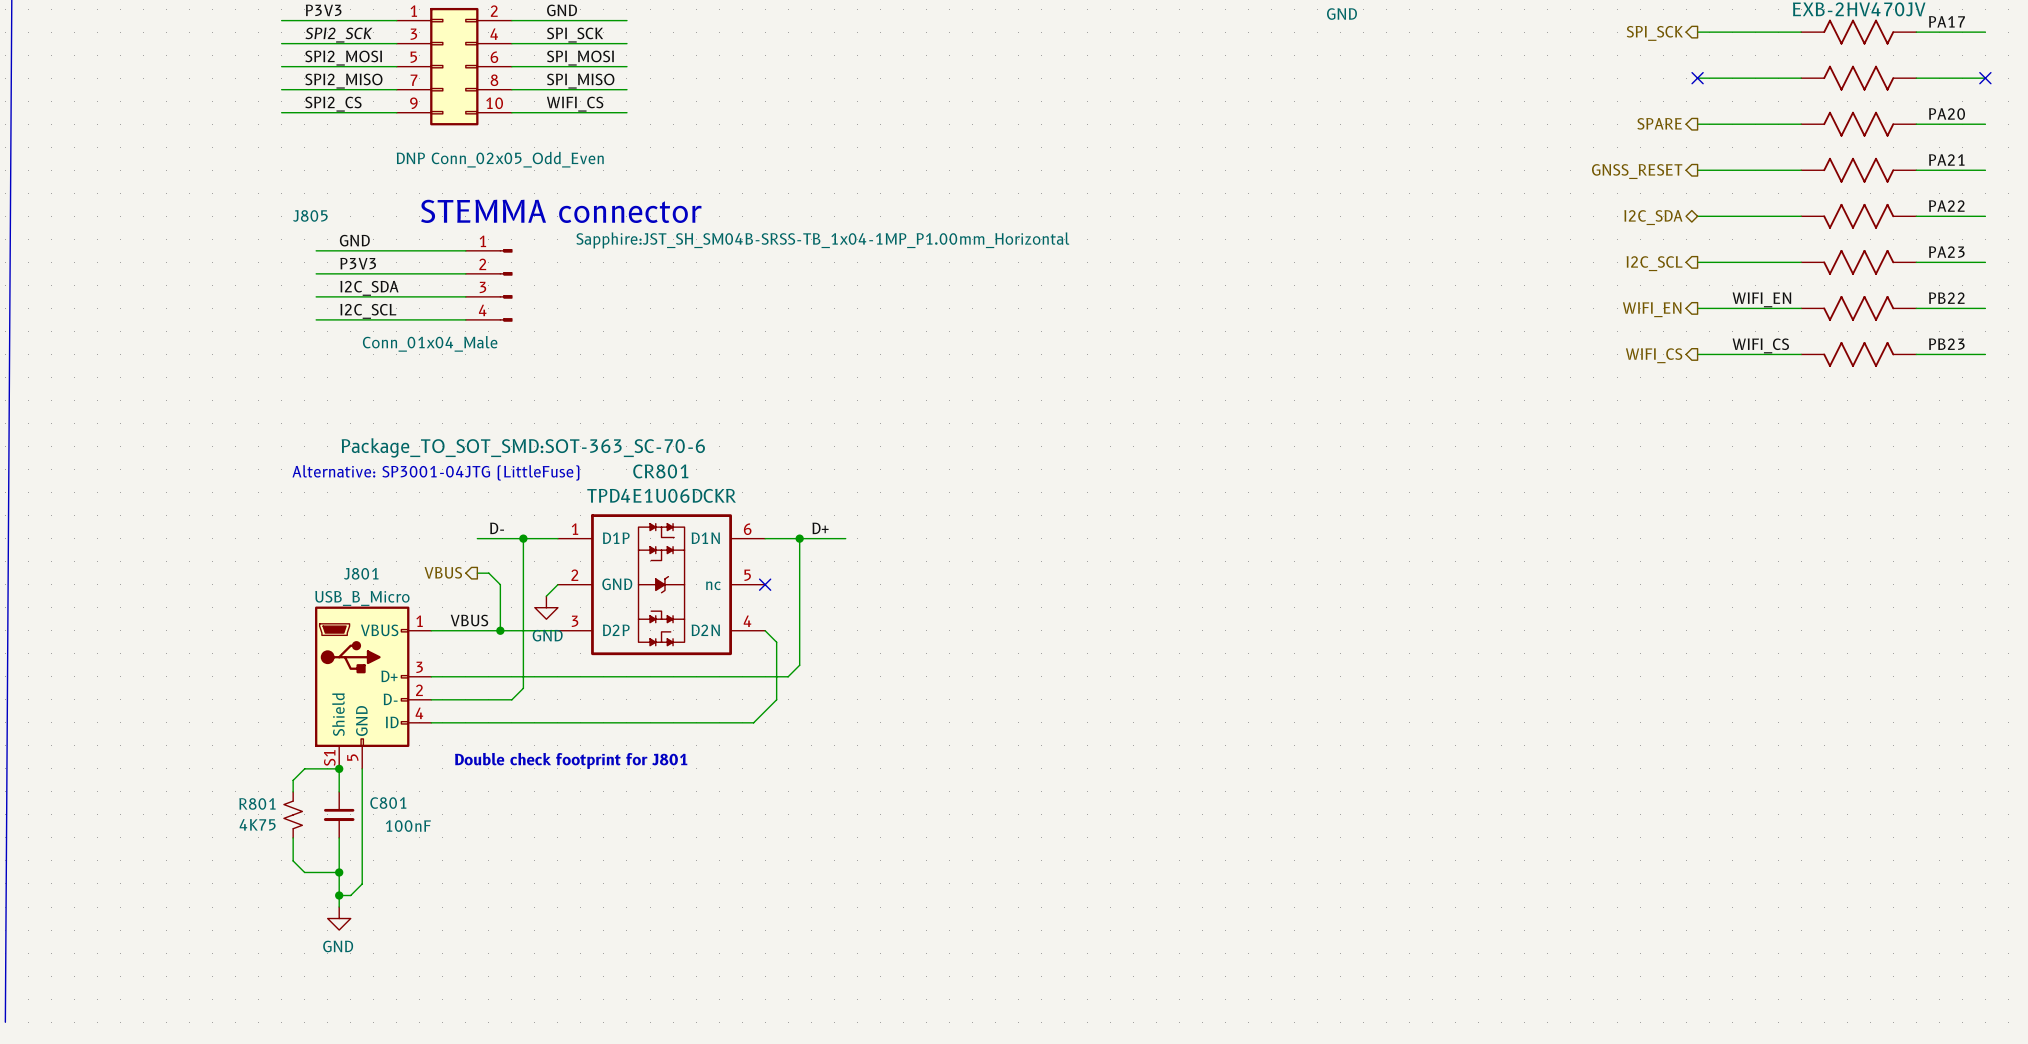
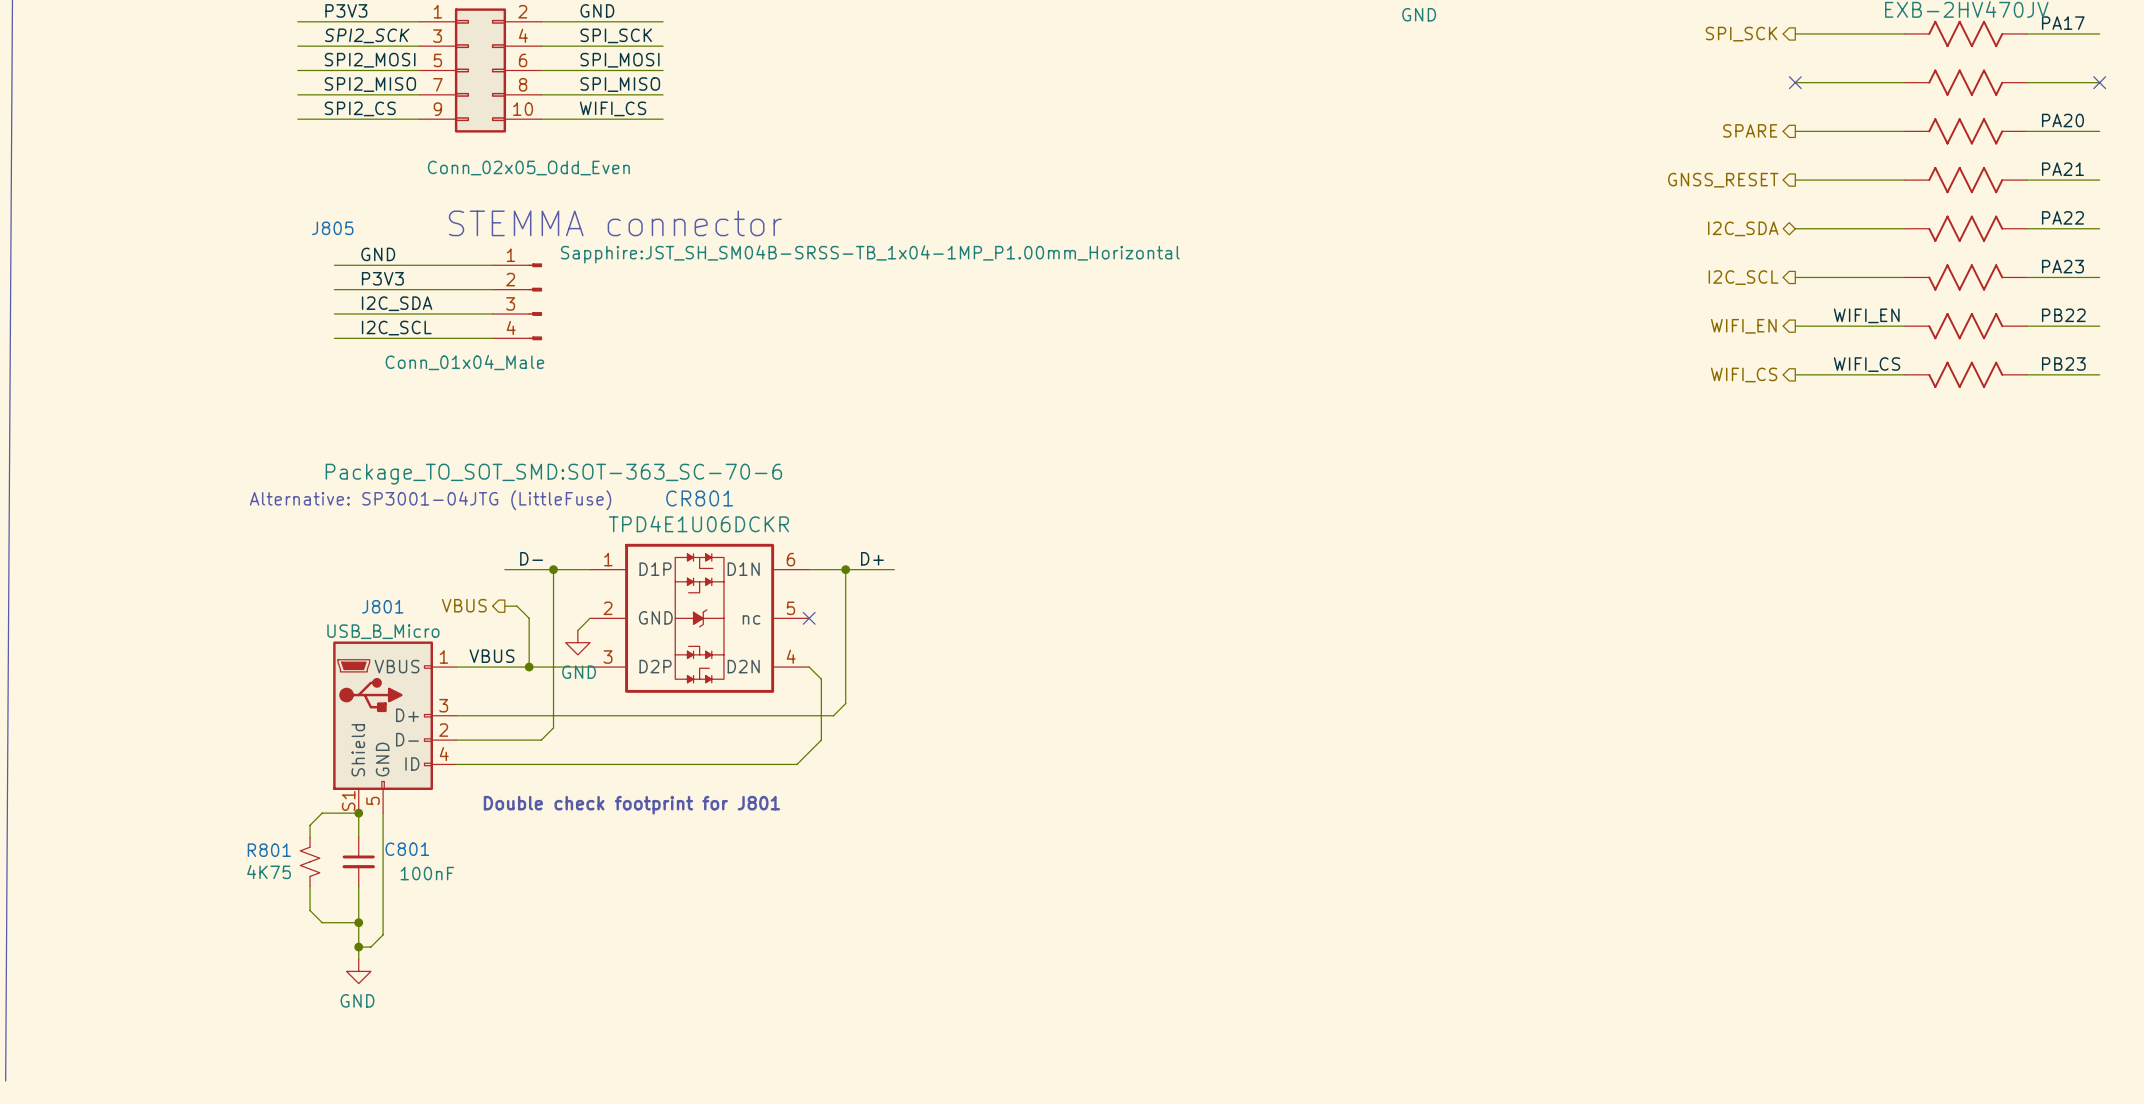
part value: DNP Conn_02x05_Odd_Even (500, 159) -> Conn_02x05_Odd_Even (528, 168)

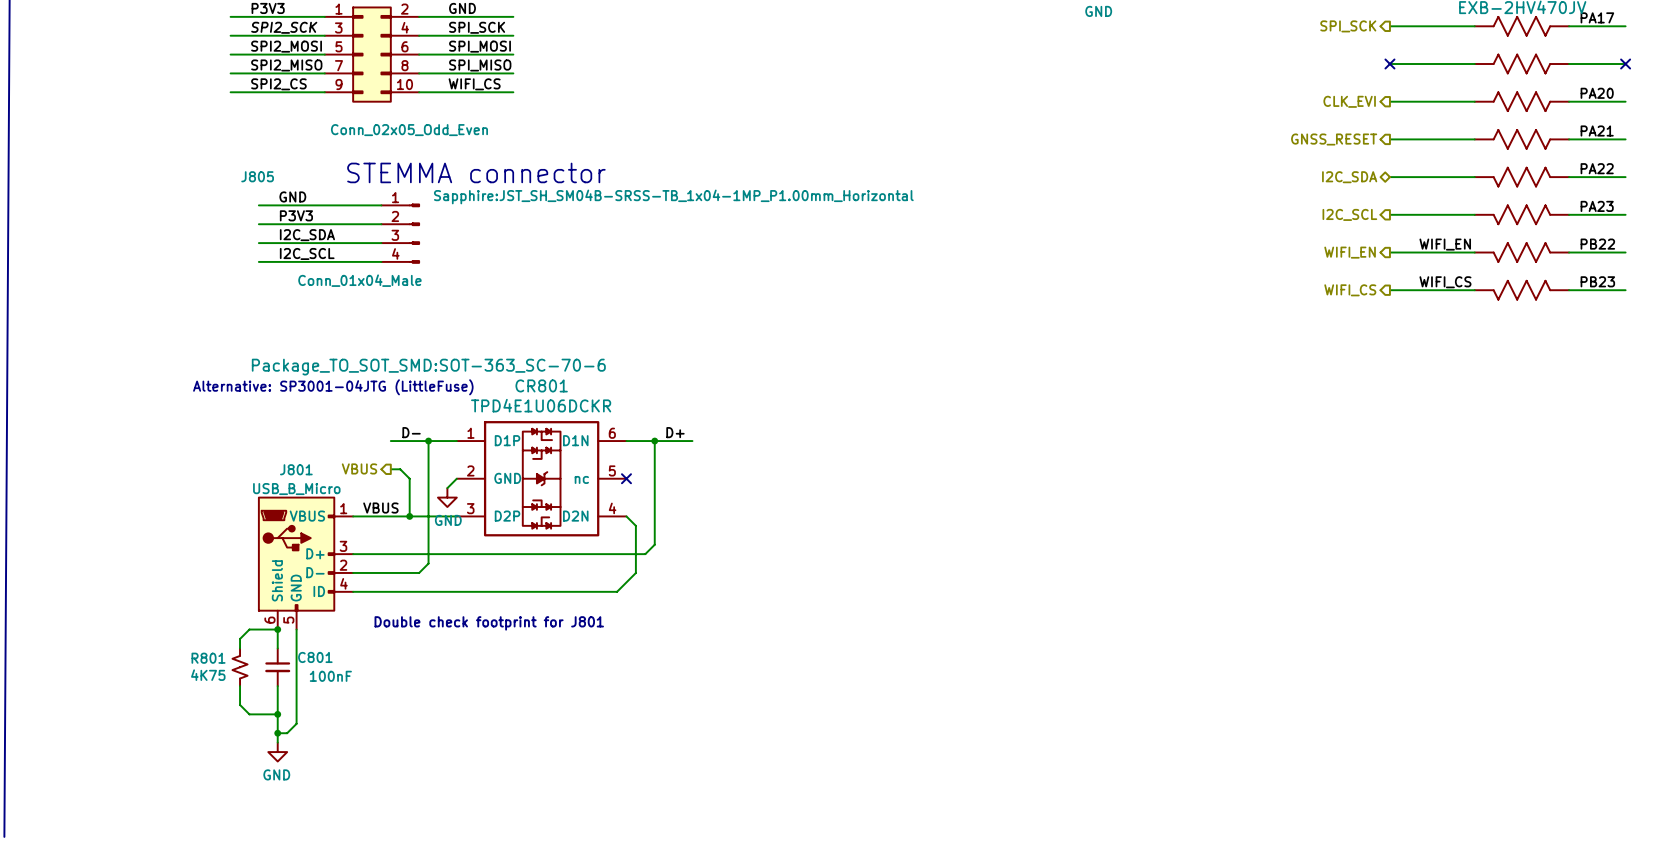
hierarchical label: SPARE (1750, 130) -> CLK_EVI (1349, 101)
J801 pin number: S1 (348, 800) -> 6 (269, 620)

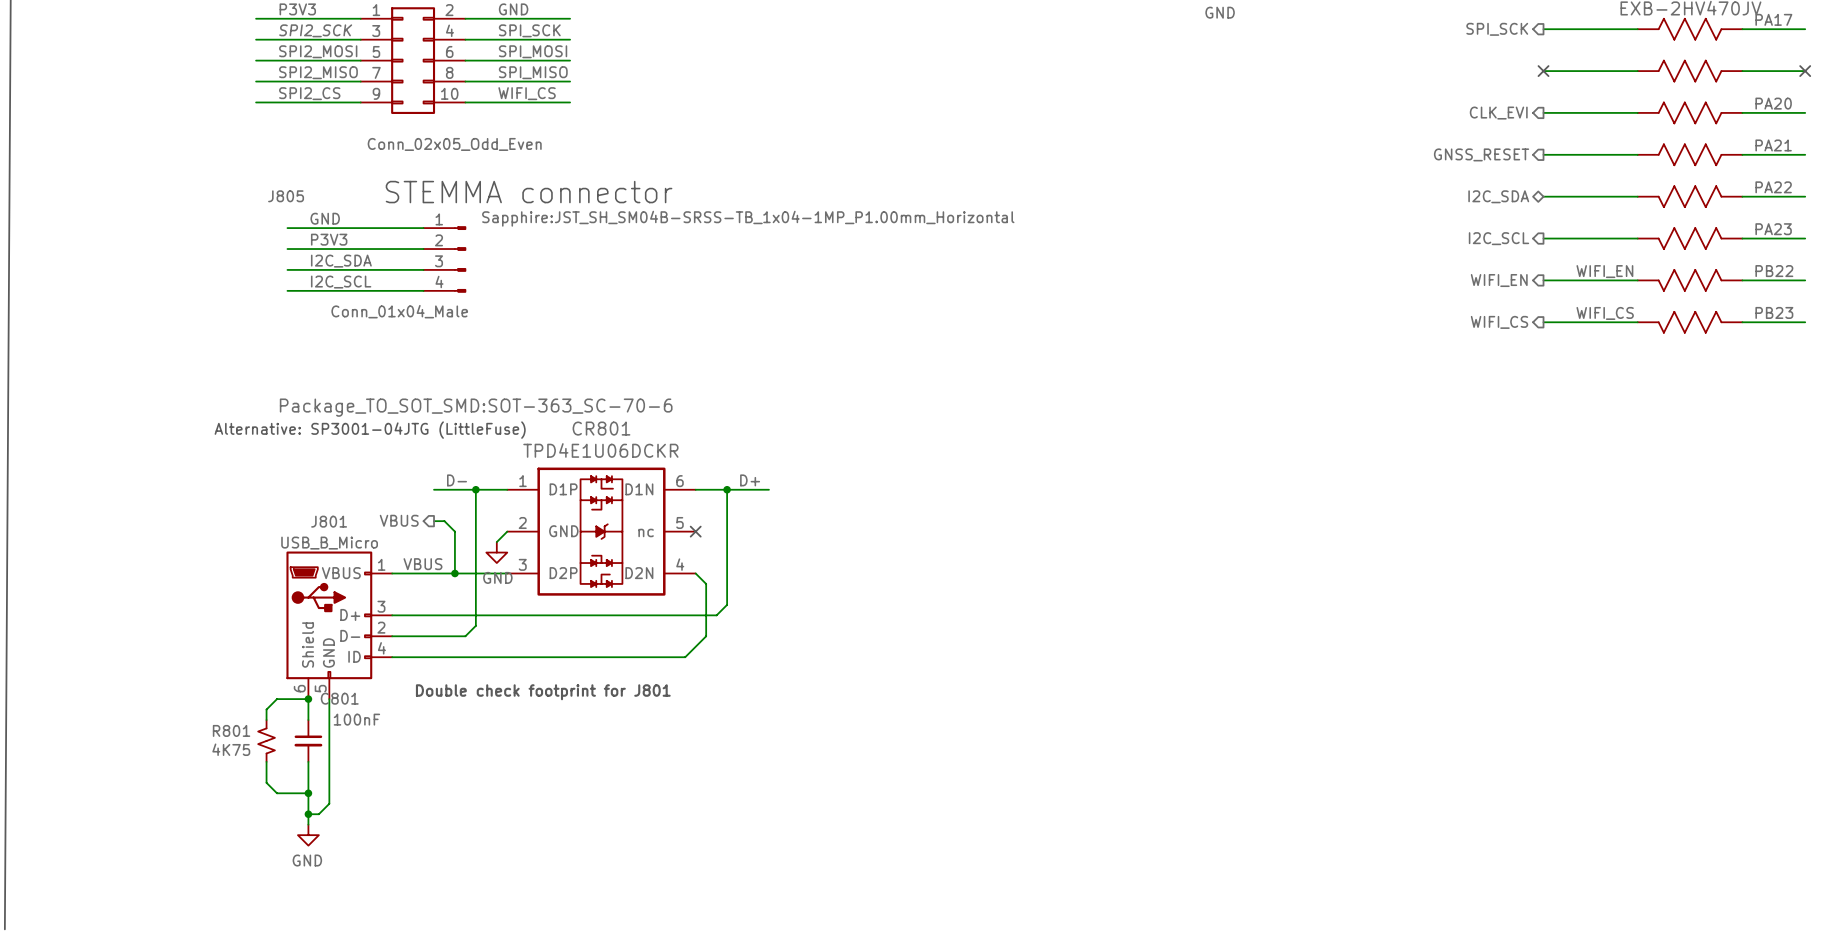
C801 name position: C801 (315, 657) -> C801 (339, 698)
C801 value position: 100nF (330, 676) -> 100nF (356, 719)

